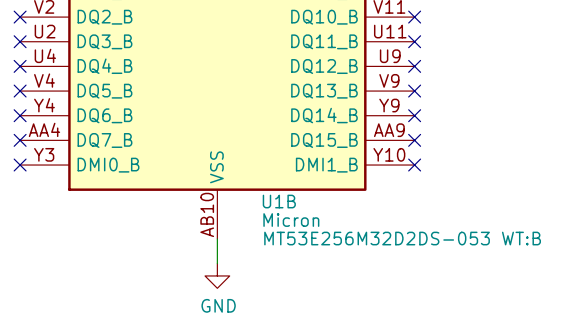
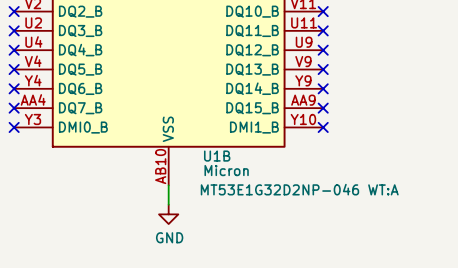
U1B text: MT53E256M32D2DS-053 WT:B (402, 238) -> MT53E1G32D2NP-046 WT:A (299, 189)

